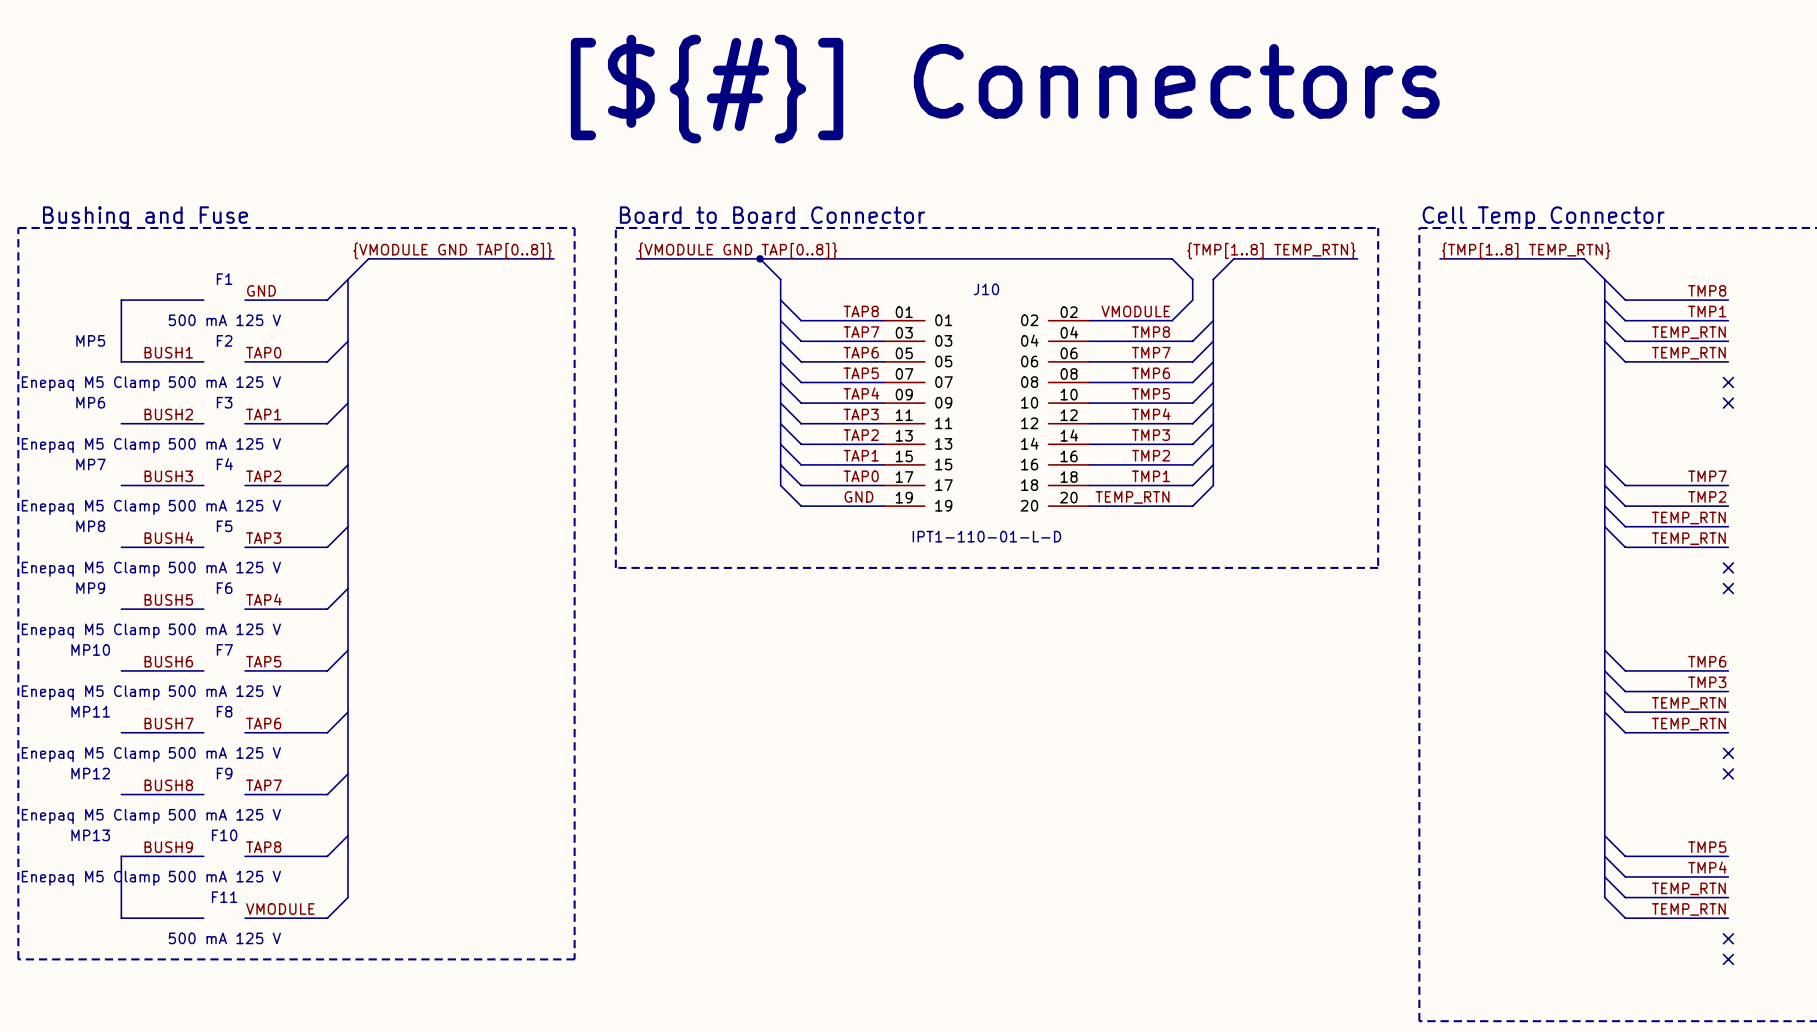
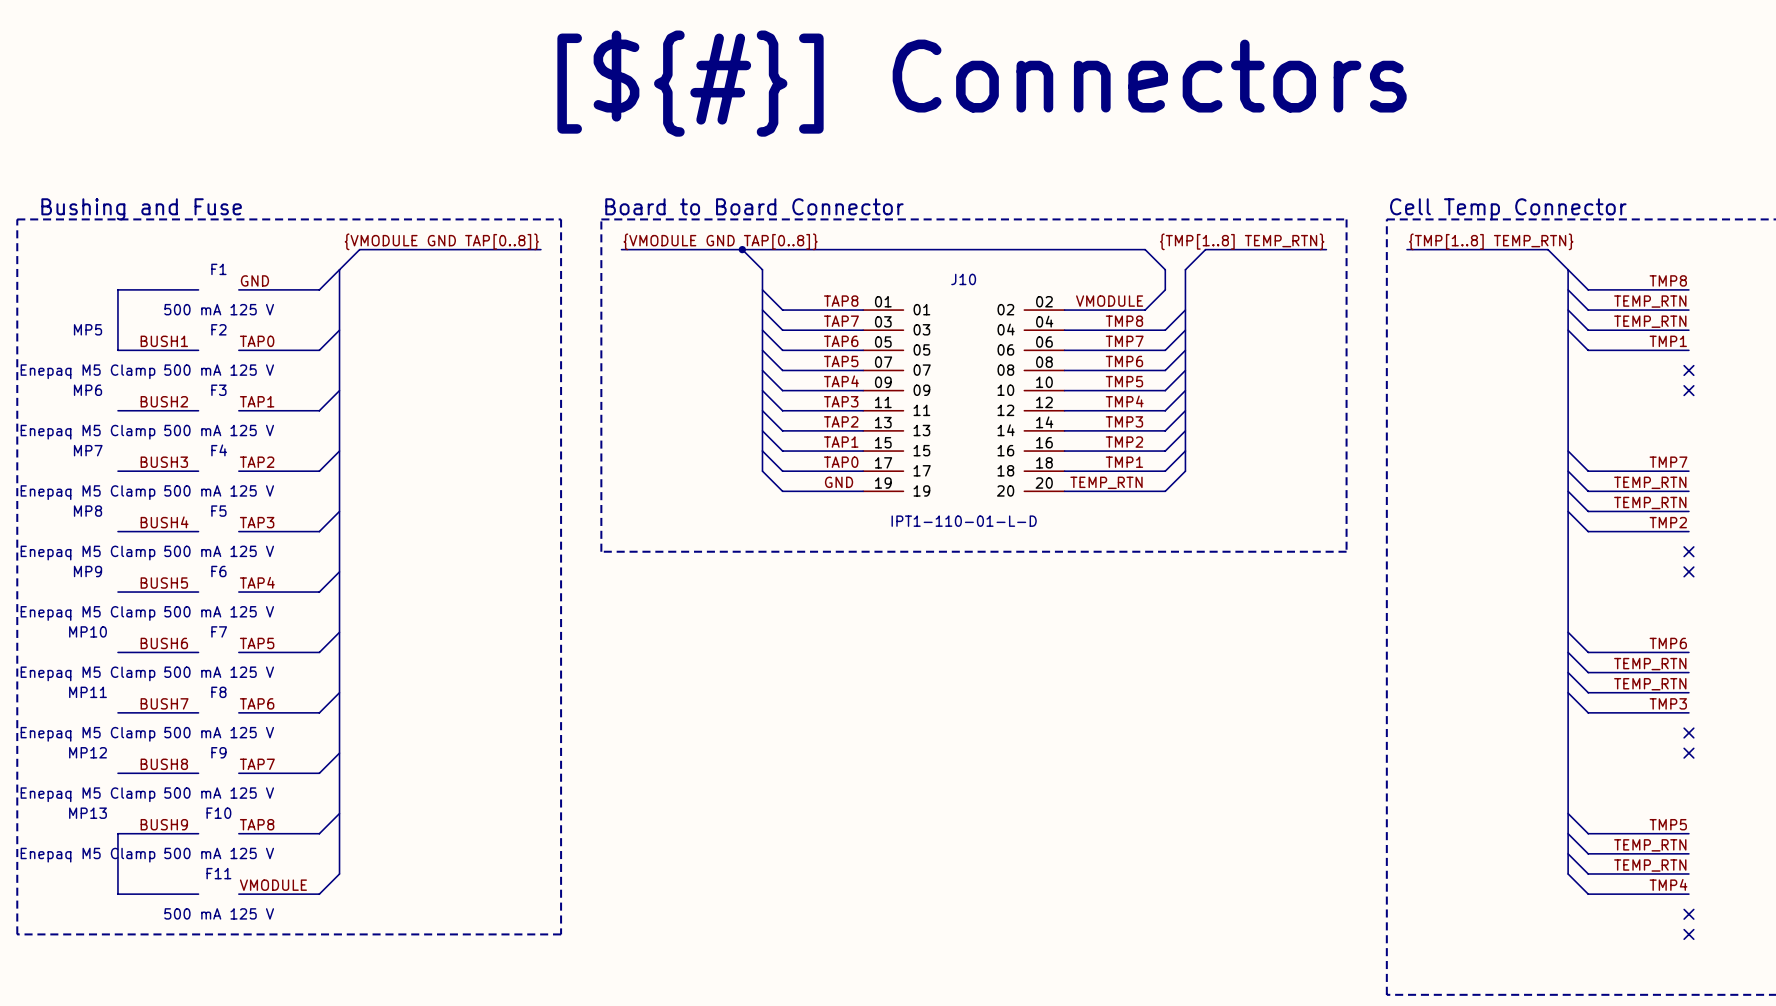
label: TMP1 (1707, 311) -> TEMP_RTN (1650, 301)
label: TEMP_RTN (1688, 353) -> TMP1 (1668, 341)
label: TMP2 (1707, 496) -> TEMP_RTN (1650, 482)
label: TEMP_RTN (1688, 538) -> TMP2 (1668, 522)
label: TMP3 (1707, 682) -> TEMP_RTN (1650, 664)
label: TEMP_RTN (1688, 724) -> TMP3 (1668, 703)
label: TMP4 (1707, 867) -> TEMP_RTN (1650, 845)
label: TEMP_RTN (1688, 909) -> TMP4 (1668, 884)

